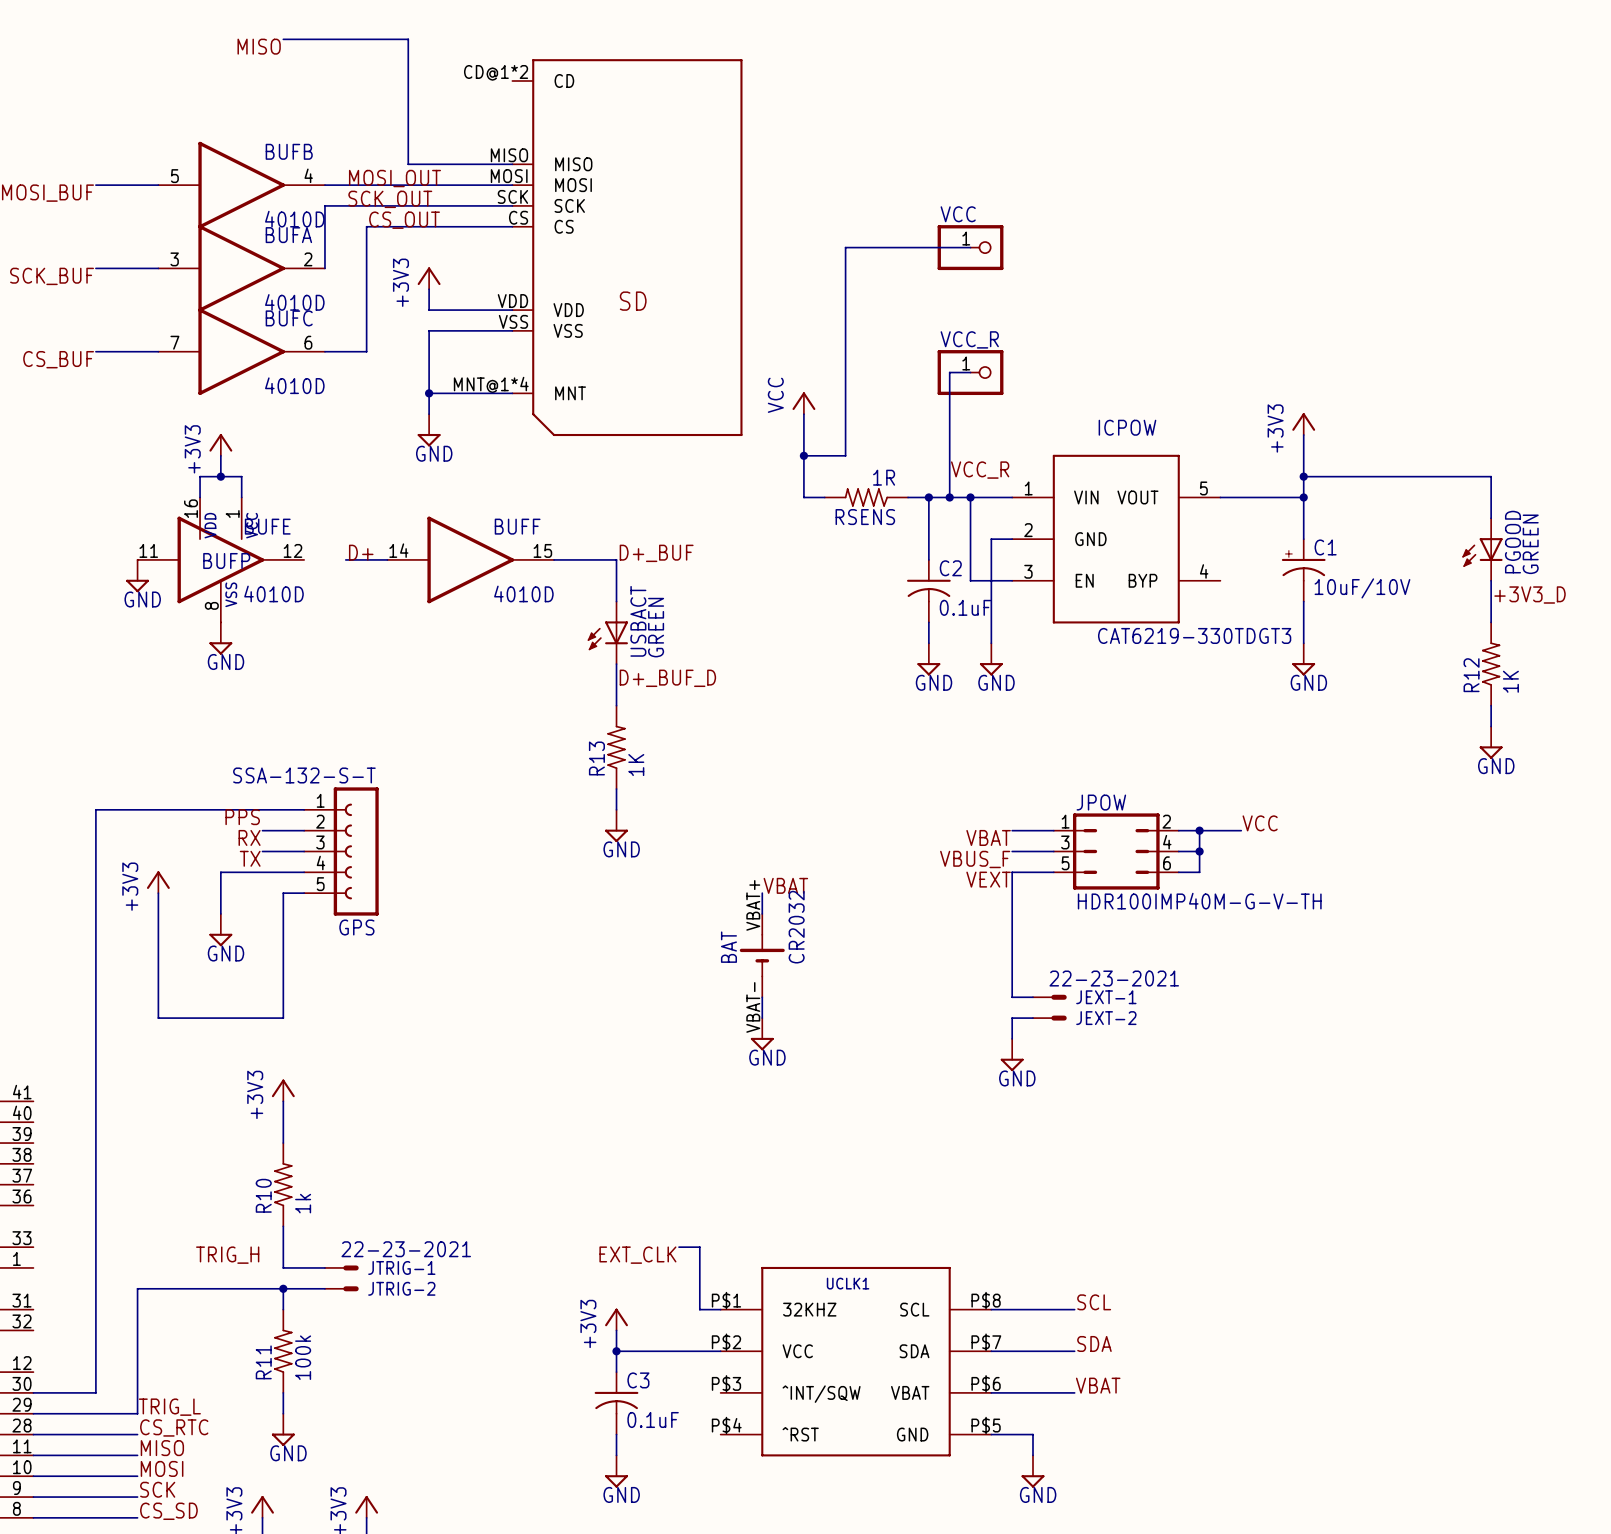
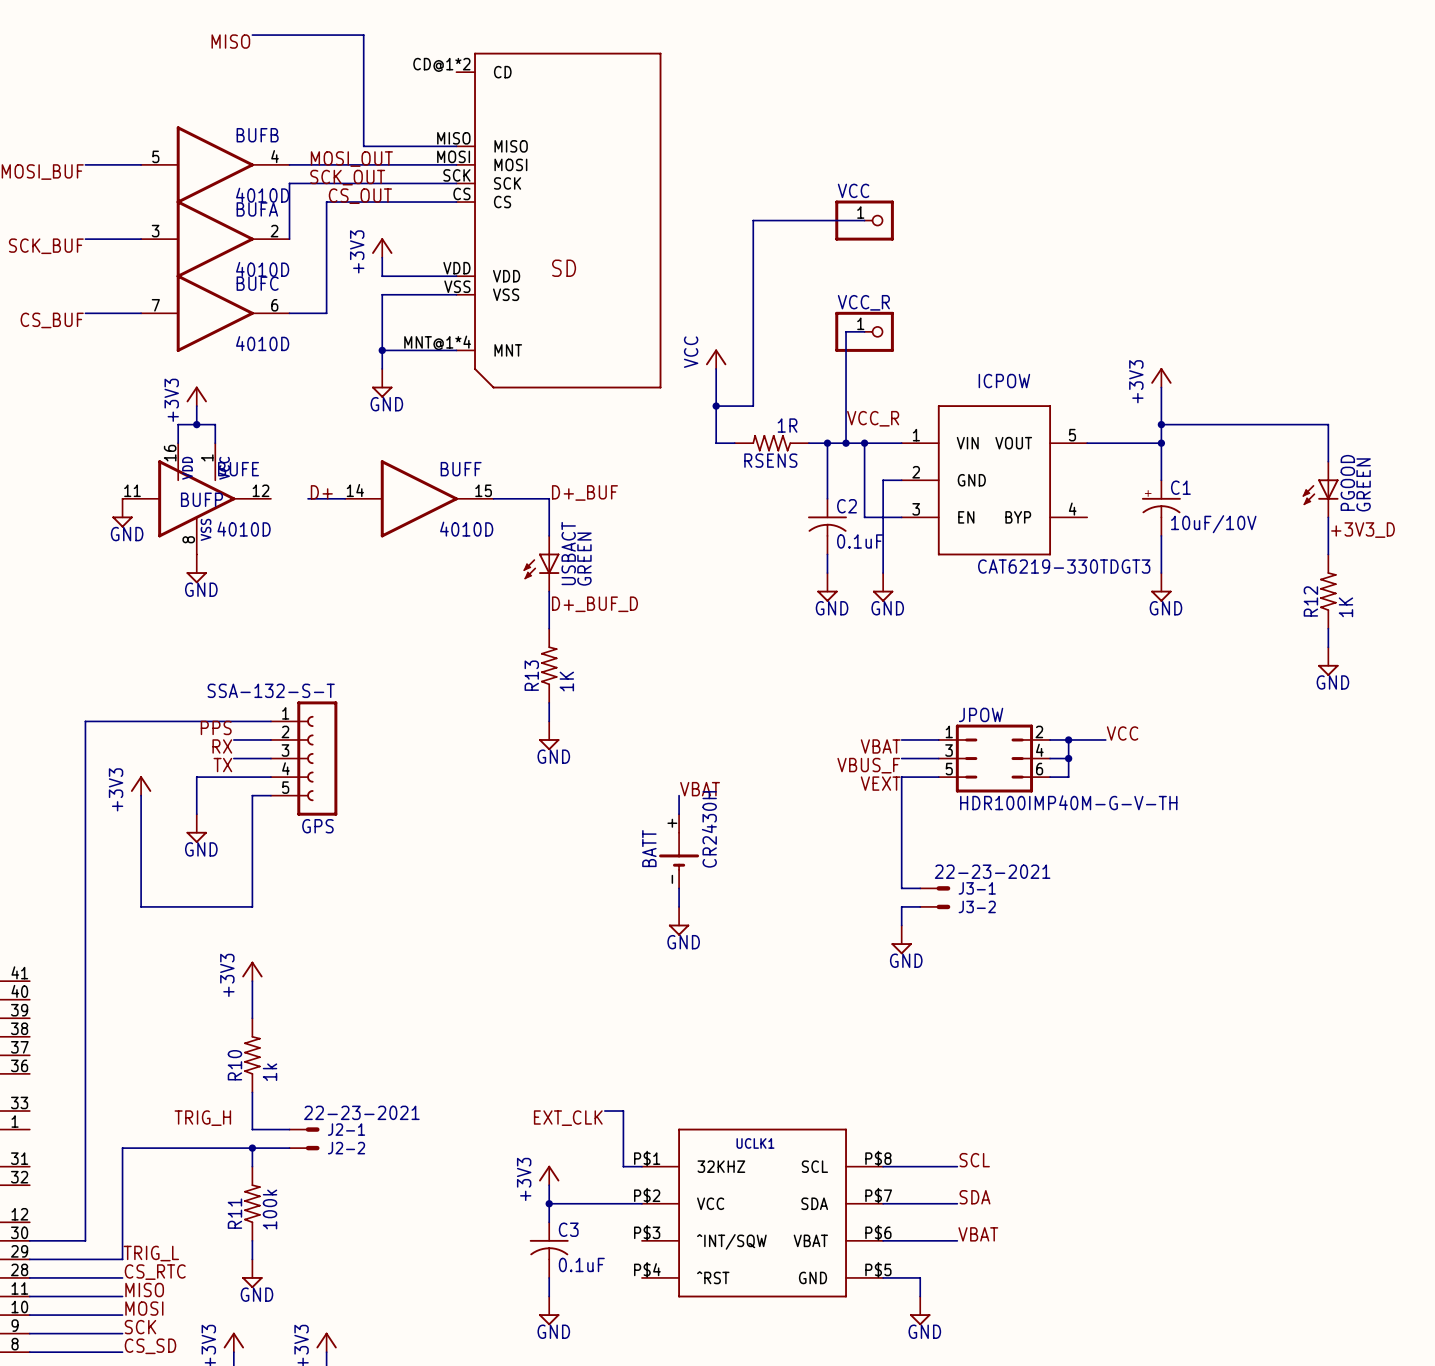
BAT: CR2032 (762, 955) -> none
BATT: none -> CR2430H (679, 851)
JEXT-1 name: JEXT-1 (1106, 997) -> J3-1 (977, 888)
JEXT-2 name: JEXT-2 (1106, 1018) -> J3-2 (977, 906)
JTRIG-1 name: JTRIG-1 (401, 1267) -> J2-1 (346, 1129)
JTRIG-2 name: JTRIG-2 (401, 1288) -> J2-2 (346, 1148)

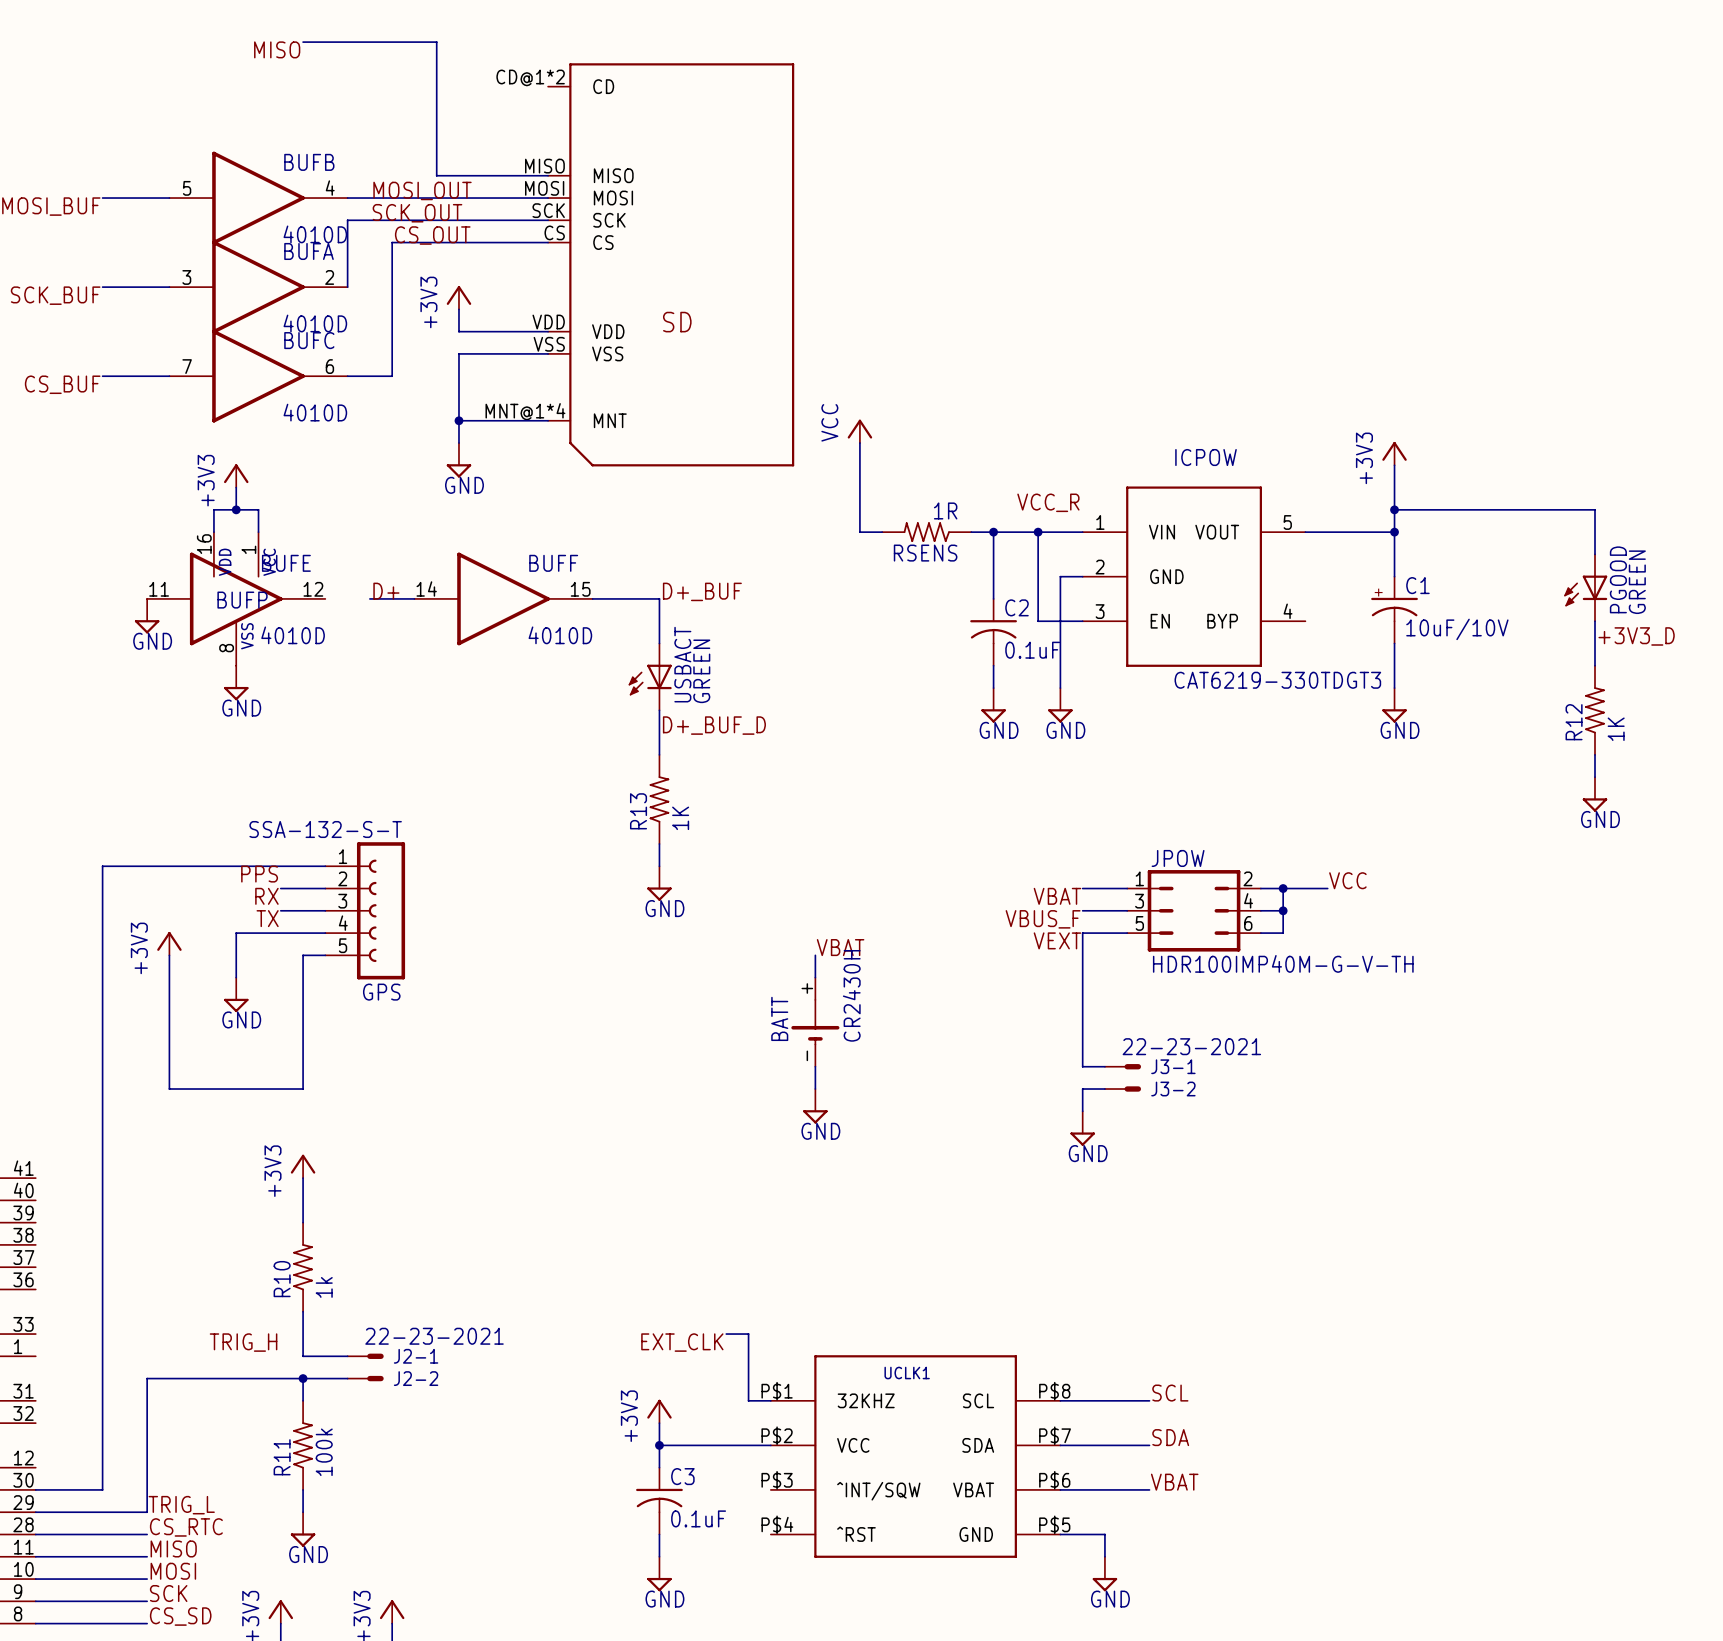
wire: (864, 220) (753, 220) (753, 406) (716, 406) -> none
VCC: (864, 220) -> none
wire: (864, 331) (846, 331) (846, 443) -> none
VCC_R: (864, 331) -> none
junction: (716, 406) -> none
junction: (846, 443) -> none

